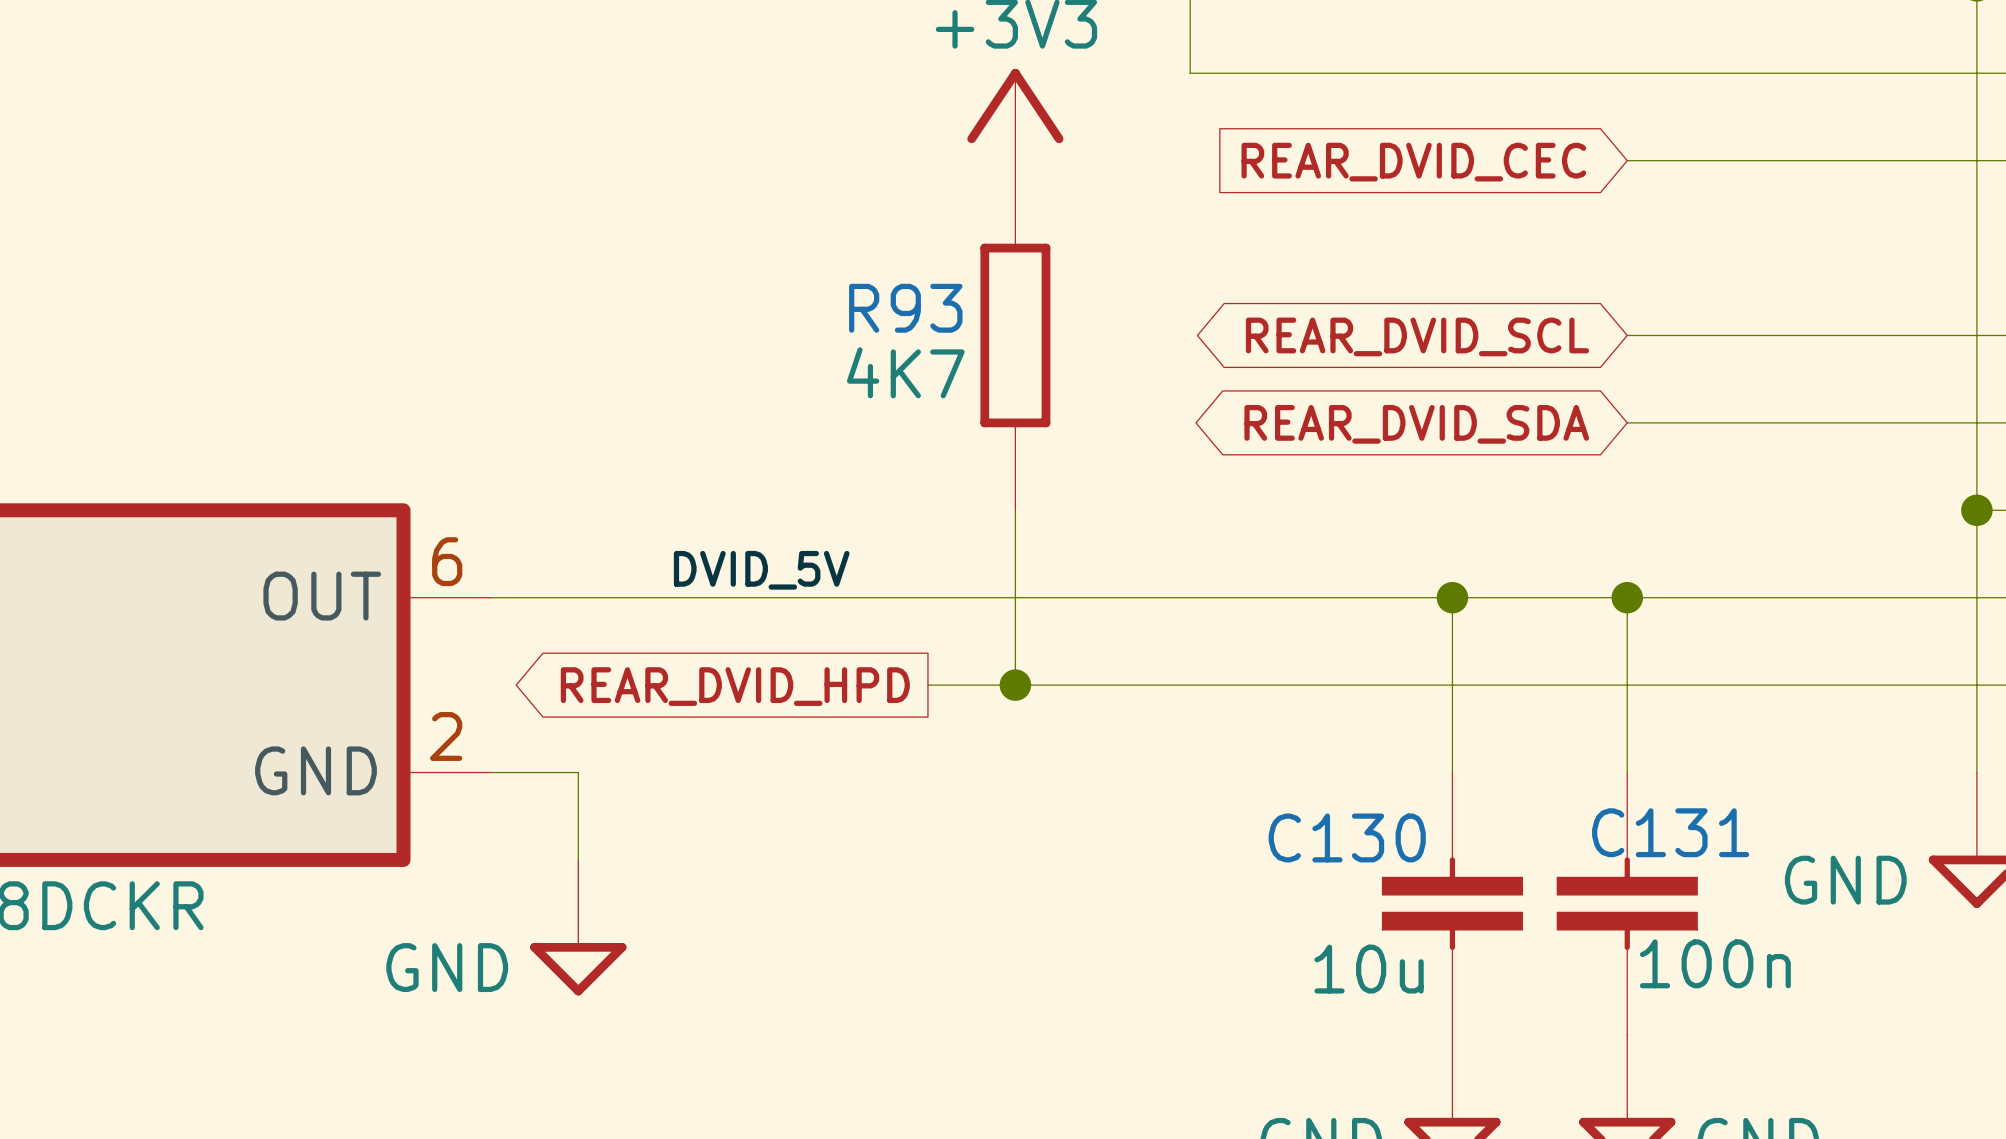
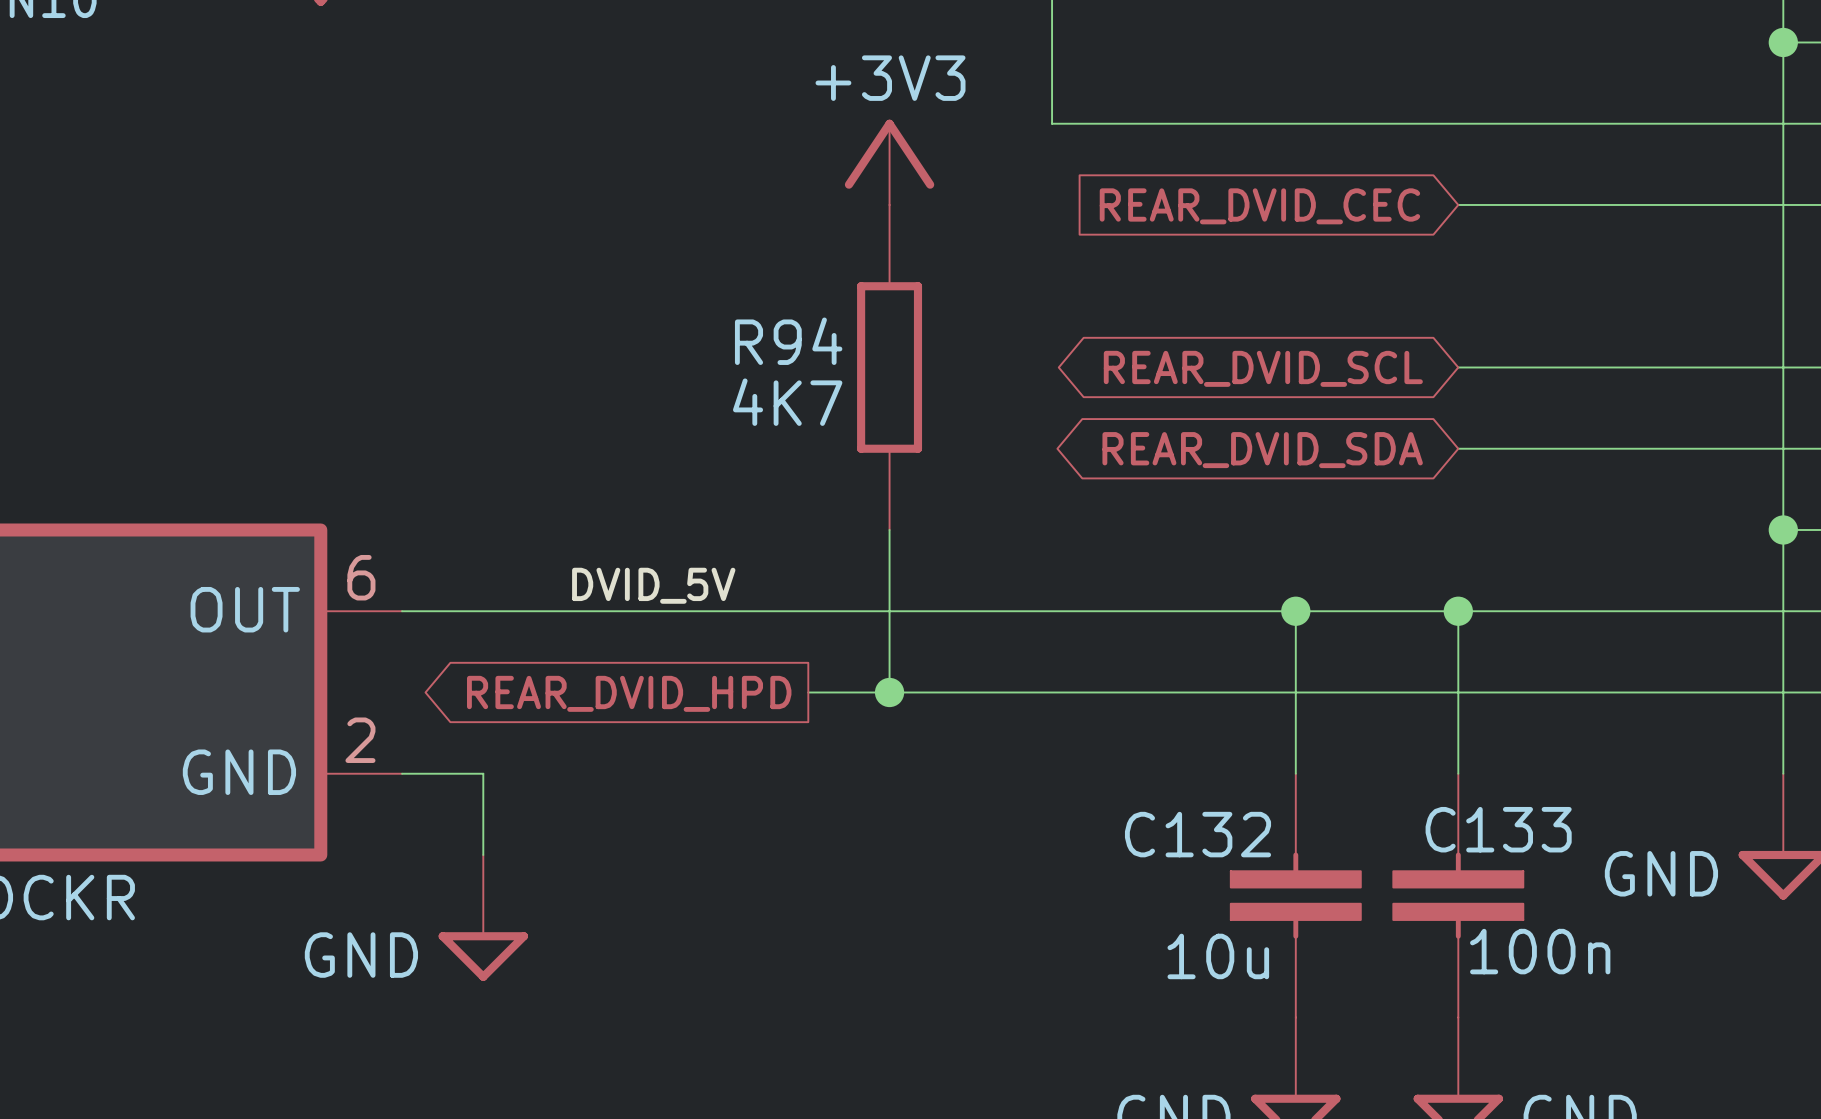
R93 name: R93 (905, 308) -> R94 (788, 341)
C131 name: C131 (1670, 832) -> C133 (1498, 829)
C130 name: C130 (1347, 837) -> C132 (1198, 834)

